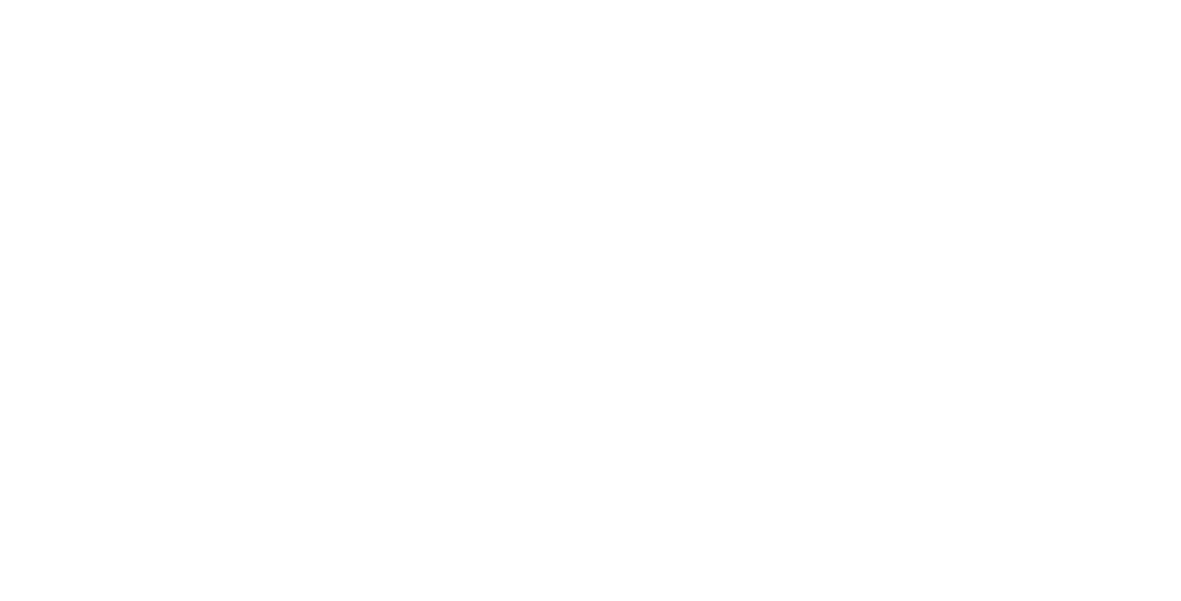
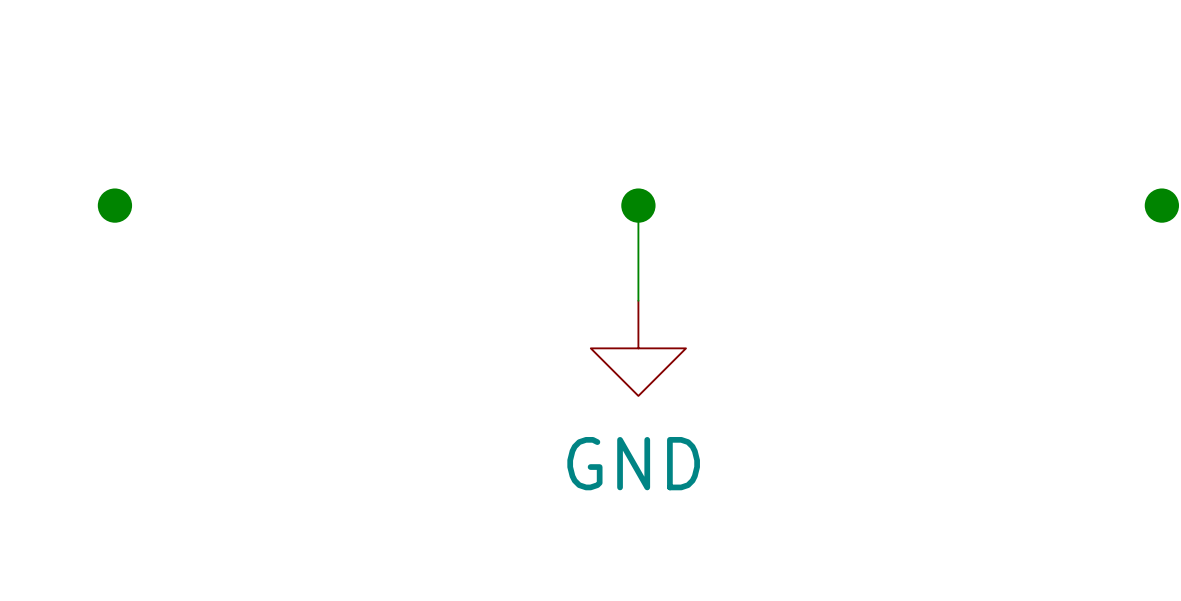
junction: none -> (114, 205)
wire: none -> (638, 205) (638, 300)
junction: none -> (638, 205)
junction: none -> (1161, 205)
power symbol: none -> GND (638, 348)

